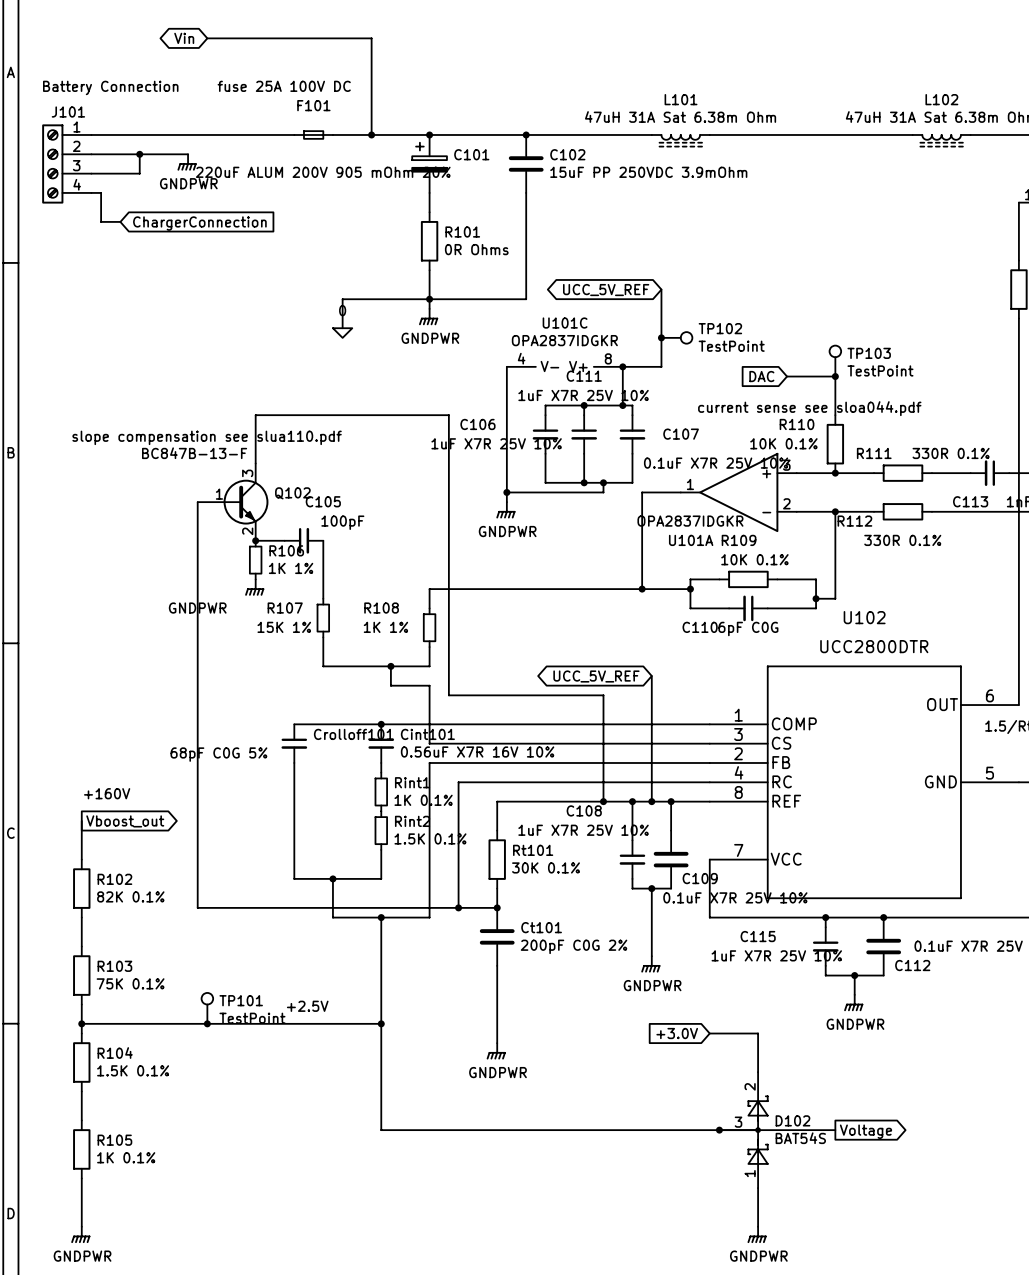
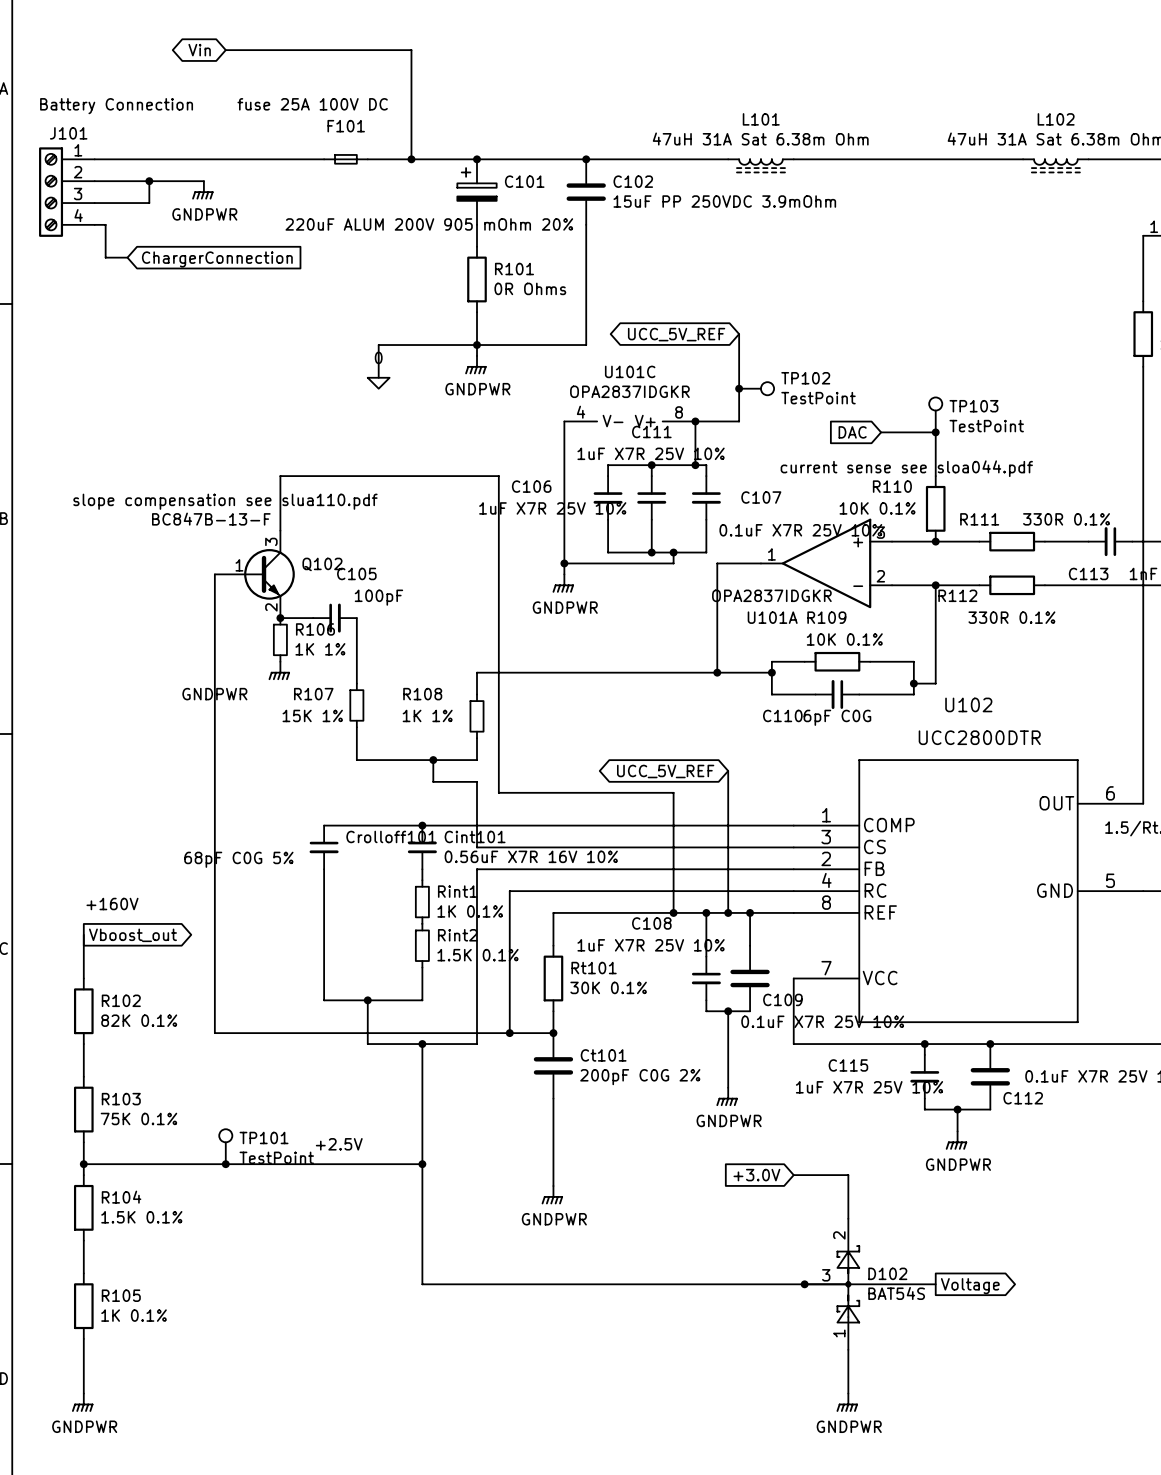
C101 value position: 220uF ALUM 200V 905 mOhm 20% (323, 172) -> 220uF ALUM 200V 905 mOhm 20% (429, 224)

